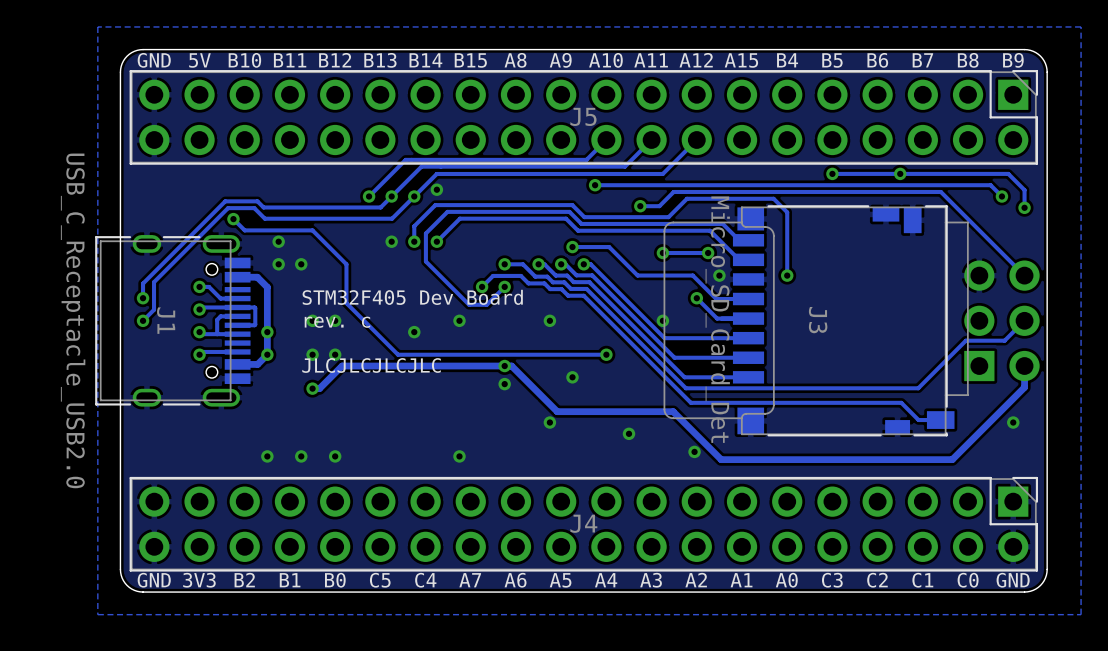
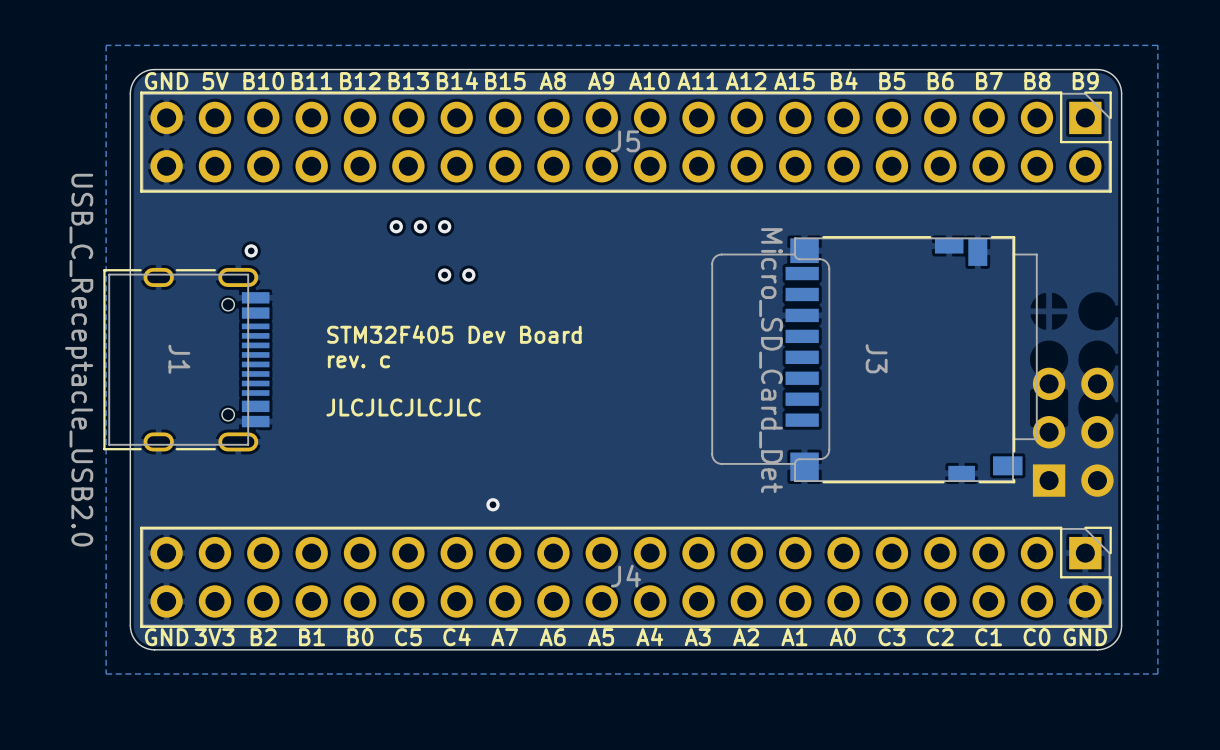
track: (606, 139) (586, 159) (405, 159) (369, 196) -> none
track: (651, 139) (624, 166) (421, 166) (380, 207) (263, 207) (257, 201) (225, 201) (143, 283) (143, 298) -> none
track: (696, 139) (662, 173) (436, 173) (392, 218) (264, 218) (254, 208) (228, 208) (154, 282) (154, 309) (143, 320) -> none
track: (832, 173) (1008, 173) (1024, 190) (1024, 207) -> none
via: (832, 173) -> none
via: (900, 173) -> none
track: (595, 185) (990, 185) (1001, 196) -> none
via: (595, 185) -> none
via: (436, 189) -> none
via: (1001, 196) -> none
track: (640, 206) (659, 206) (673, 191) (940, 191) (1024, 275) -> none
via: (640, 206) -> none
via: (1024, 207) -> none
track: (233, 219) (244, 230) (312, 230) (346, 264) (346, 303) (398, 354) (606, 354) -> none
track: (748, 240) (739, 240) (722, 223) (581, 223) (569, 211) (447, 211) (425, 233) (425, 261) (469, 304) (486, 304) (504, 286) -> none
via: (278, 241) -> none
via: (391, 241) -> none
track: (414, 241) (414, 226) (435, 205) (572, 205) (584, 217) (668, 217) (686, 198) (773, 198) (787, 212) (787, 275) -> none
track: (436, 241) (459, 218) (566, 218) (578, 230) (710, 230) (739, 259) (748, 259) -> none
track: (572, 247) (609, 247) (637, 275) (692, 275) (716, 299) (748, 299) -> none
via: (572, 247) -> none
via: (662, 253) -> none
track: (708, 253) (662, 253) -> none
via: (708, 253) -> none
via: (278, 264) -> none
via: (301, 264) -> none
track: (504, 264) (523, 264) (535, 276) (547, 276) (552, 282) (564, 282) (570, 288) (586, 288) (685, 388) (918, 388) (965, 340) (1004, 340) (1024, 320) -> none
via: (504, 264) -> none
track: (538, 264) (544, 264) (555, 275) (567, 275) (573, 282) (589, 282) (684, 377) (748, 377) -> none
via: (538, 264) -> none
track: (561, 264) (565, 264) (576, 275) (592, 275) (674, 357) (748, 357) -> none
via: (561, 264) -> none
track: (583, 264) (590, 264) (664, 338) (748, 338) -> none
via: (583, 264) -> none
via: (719, 275) -> none
via: (787, 275) -> none
track: (237, 277) (257, 277) (267, 287) (267, 354) (257, 364) (237, 364) -> none
track: (199, 286) (209, 286) (220, 298) (237, 298) -> none
via: (199, 286) -> none
track: (482, 286) (493, 275) (520, 275) (528, 283) (544, 283) (550, 289) (561, 289) (568, 295) (583, 295) (690, 402) (901, 402) (918, 420) (940, 420) -> none
via: (482, 286) -> none
via: (504, 286) -> none
via: (143, 298) -> none
track: (696, 298) (717, 318) (748, 318) -> none
via: (696, 298) -> none
track: (199, 309) (201, 307) (254, 307) (255, 324) (237, 325) -> none
via: (199, 309) -> none
track: (237, 316) (220, 316) (217, 319) (217, 334) -> none
via: (143, 320) -> none
via: (312, 320) -> none
via: (335, 320) -> none
via: (459, 320) -> none
via: (549, 320) -> none
via: (662, 320) -> none
part position: (1001, 320) -> (1073, 432)
track: (199, 332) (201, 334) (237, 334) -> none
via: (199, 332) -> none
via: (267, 332) -> none
via: (414, 332) -> none
track: (237, 351) (202, 351) (199, 354) -> none
via: (199, 354) -> none
via: (267, 354) -> none
via: (312, 354) -> none
via: (335, 354) -> none
via: (606, 354) -> none
via: (504, 366) -> none
track: (1024, 366) (1024, 387) (952, 459) (721, 459) (673, 411) (557, 411) (511, 366) (342, 366) (319, 388) (312, 388) -> none
via: (572, 377) -> none
via: (504, 384) -> none
via: (312, 388) -> none
via: (549, 422) -> none
via: (1013, 422) -> none
via: (629, 433) -> none
via: (694, 451) -> none
via: (267, 456) -> none
via: (301, 456) -> none
via: (335, 456) -> none

